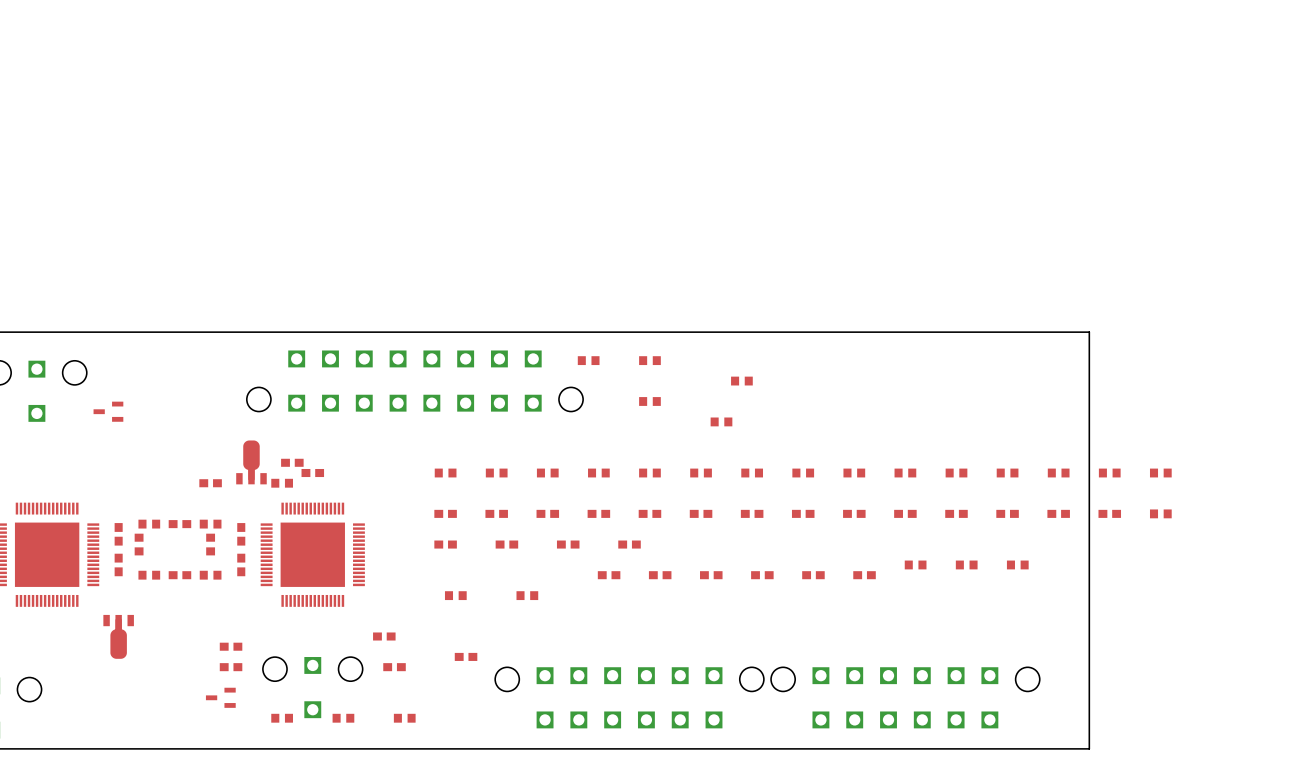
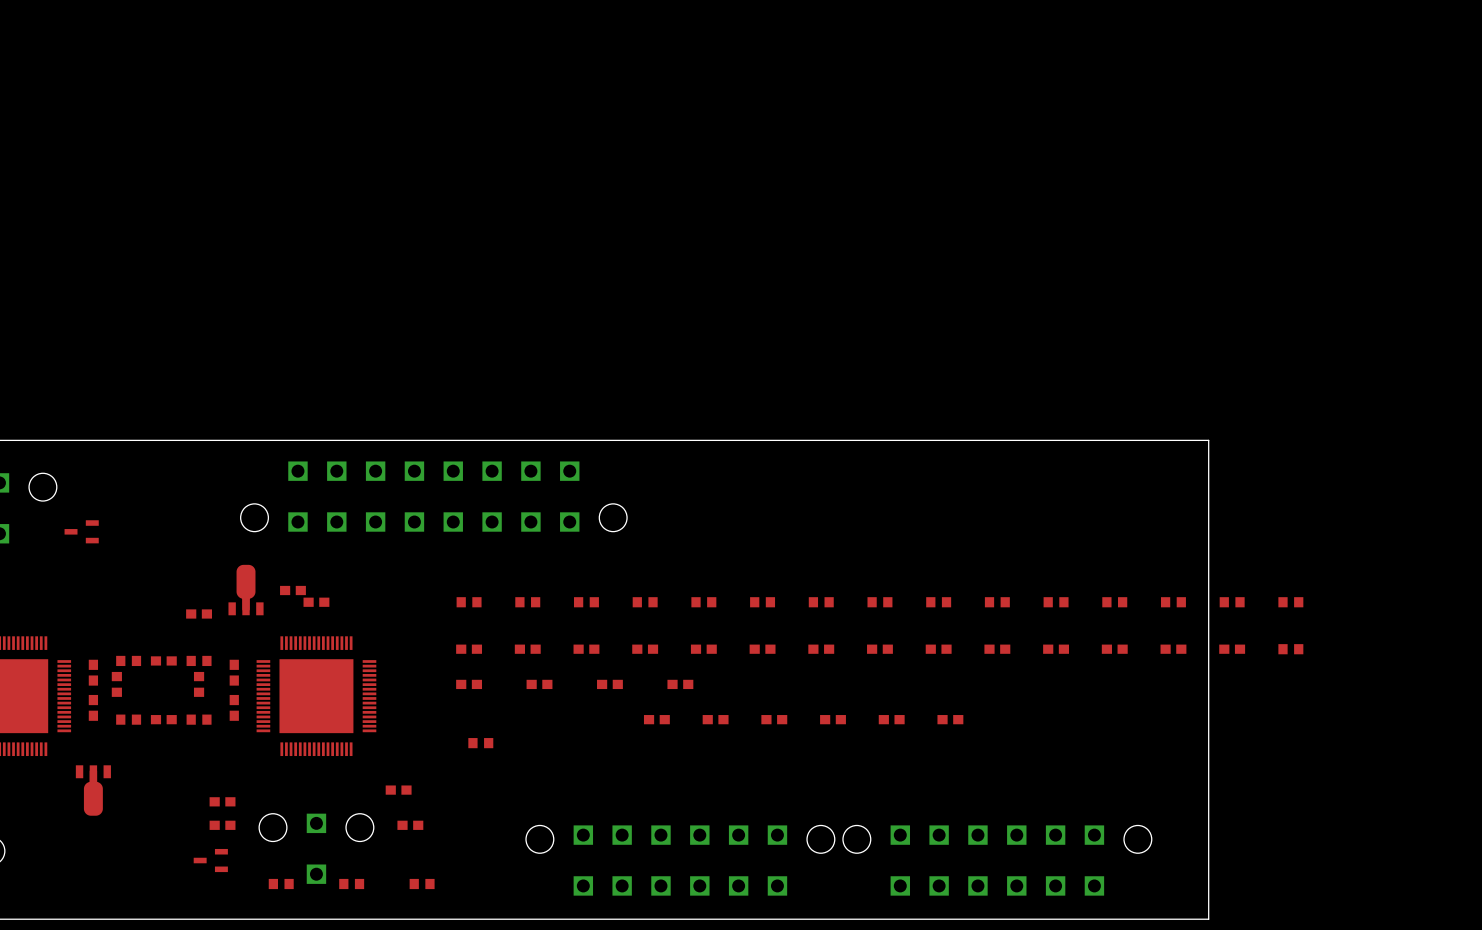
part: (588, 360) -> none
part: (649, 360) -> none
part: (741, 381) -> none
part: (649, 401) -> none
part: (721, 421) -> none
part: (282, 483) -> none
part: (915, 564) -> none
part: (966, 564) -> none
part: (1017, 564) -> none
part: (527, 595) -> none
part: (466, 656) -> none

